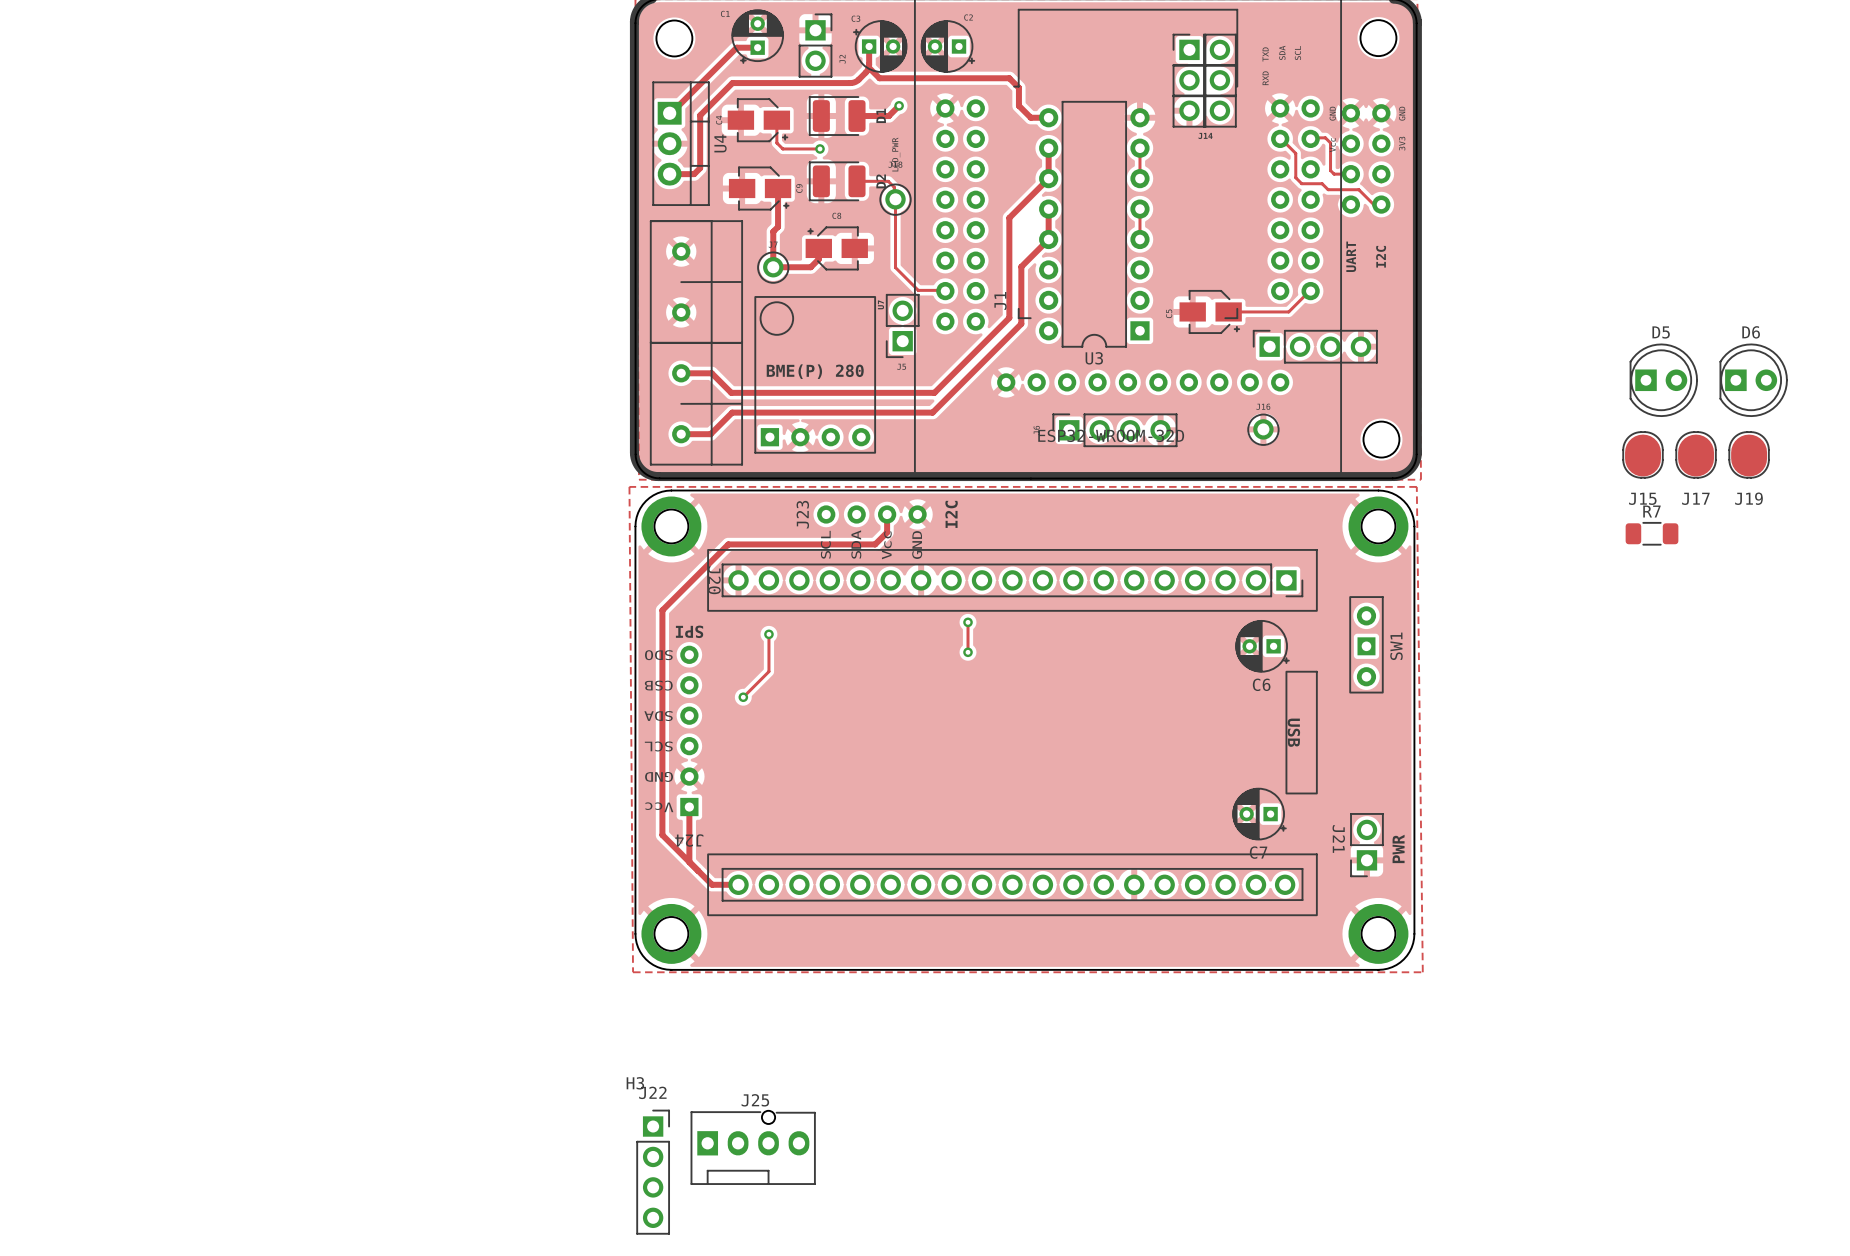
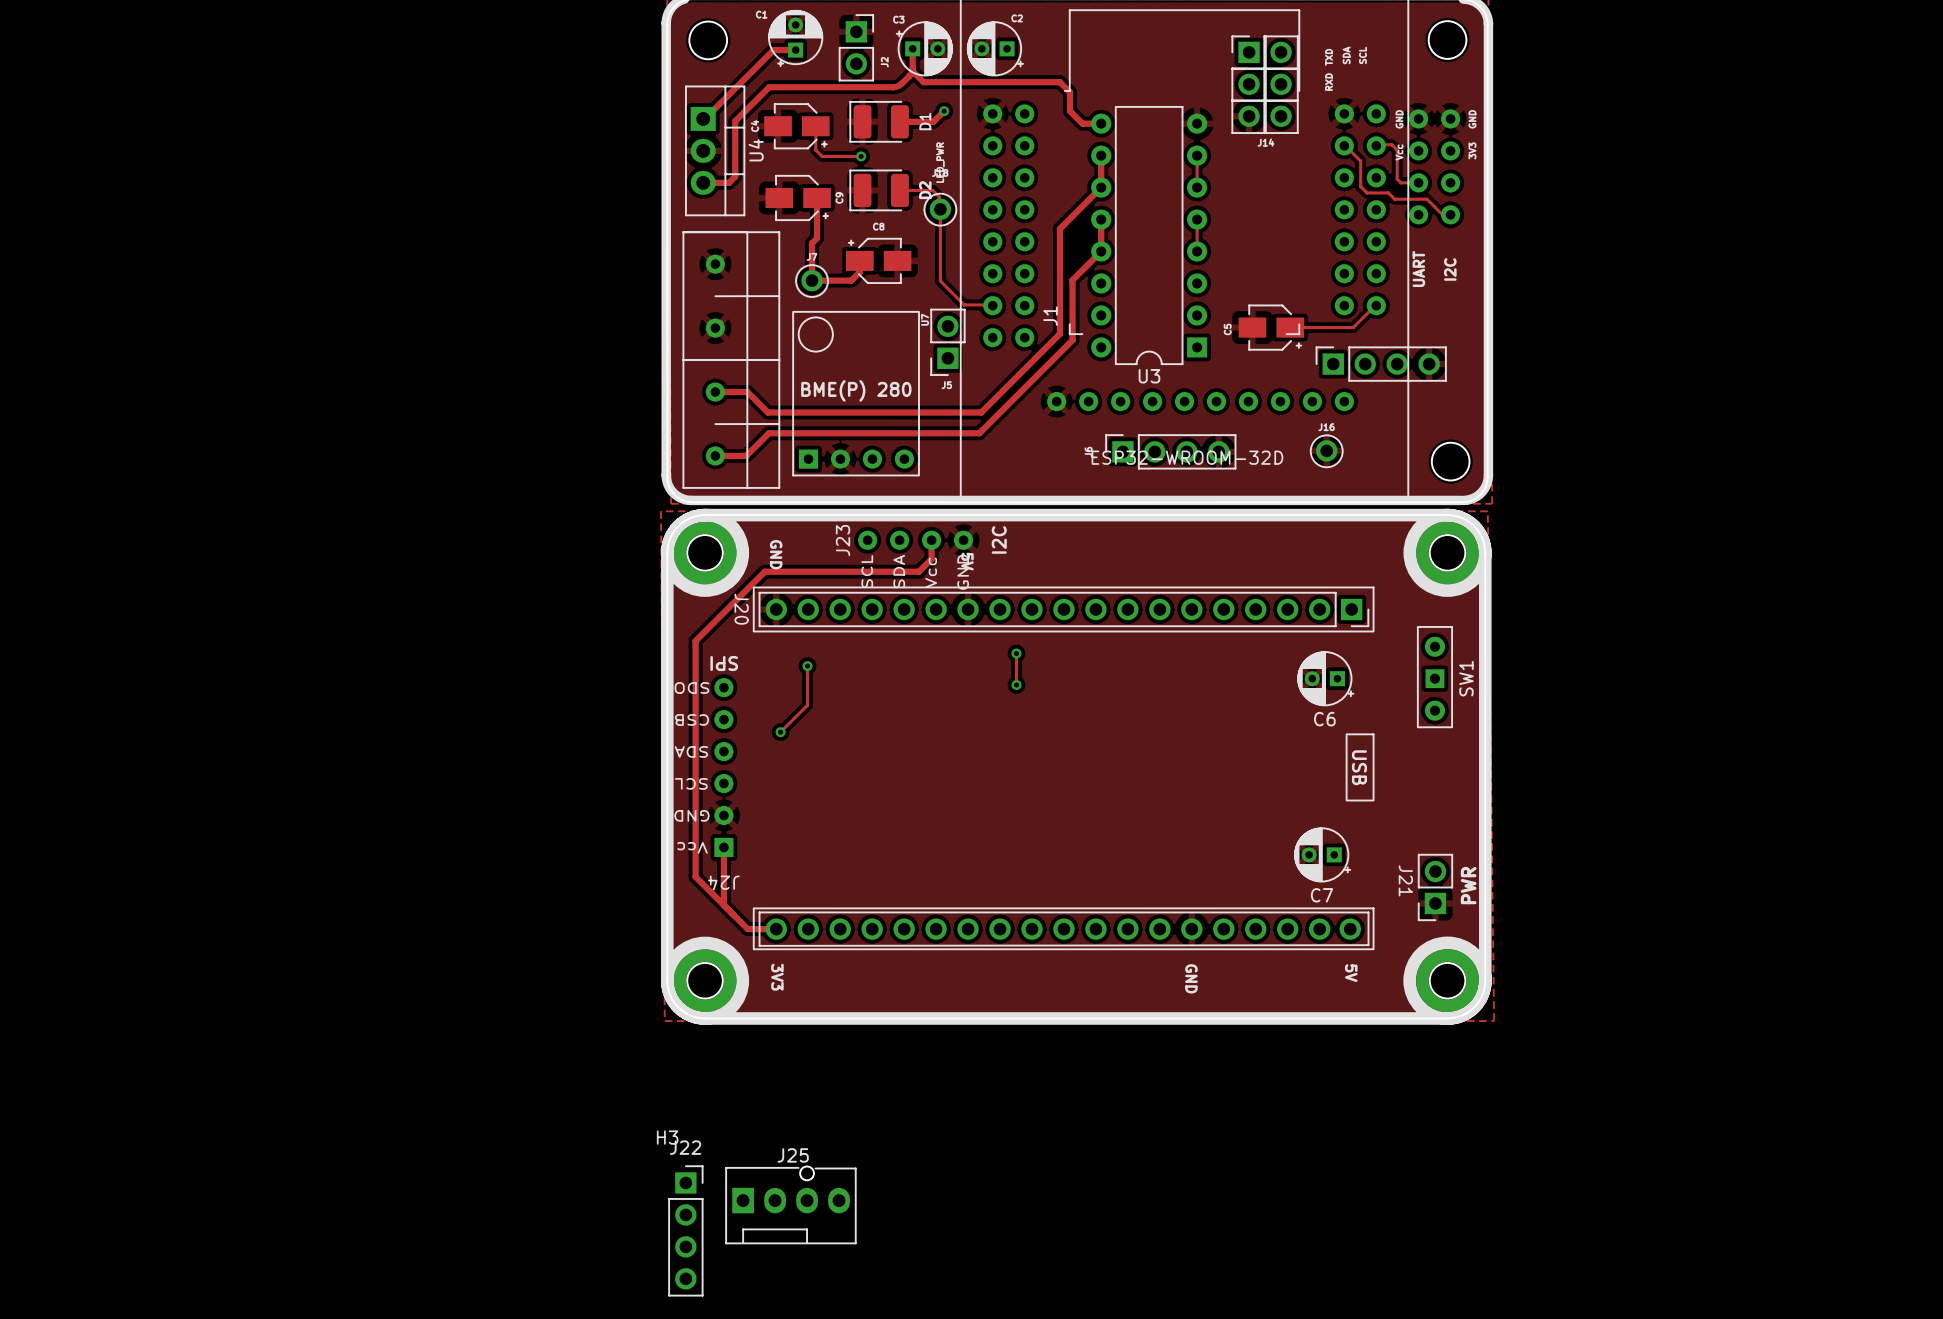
D5: (1663, 380) -> none
D6: (1753, 380) -> none
J15: (1643, 454) -> none
J17: (1696, 454) -> none
J19: (1749, 454) -> none
H3 footprint: [635, 490, 1415, 971] -> [661, 508, 1492, 1025]
R7: (1652, 533) -> none
J20 footprint: [707, 549, 1318, 916] -> [753, 586, 1375, 950]

